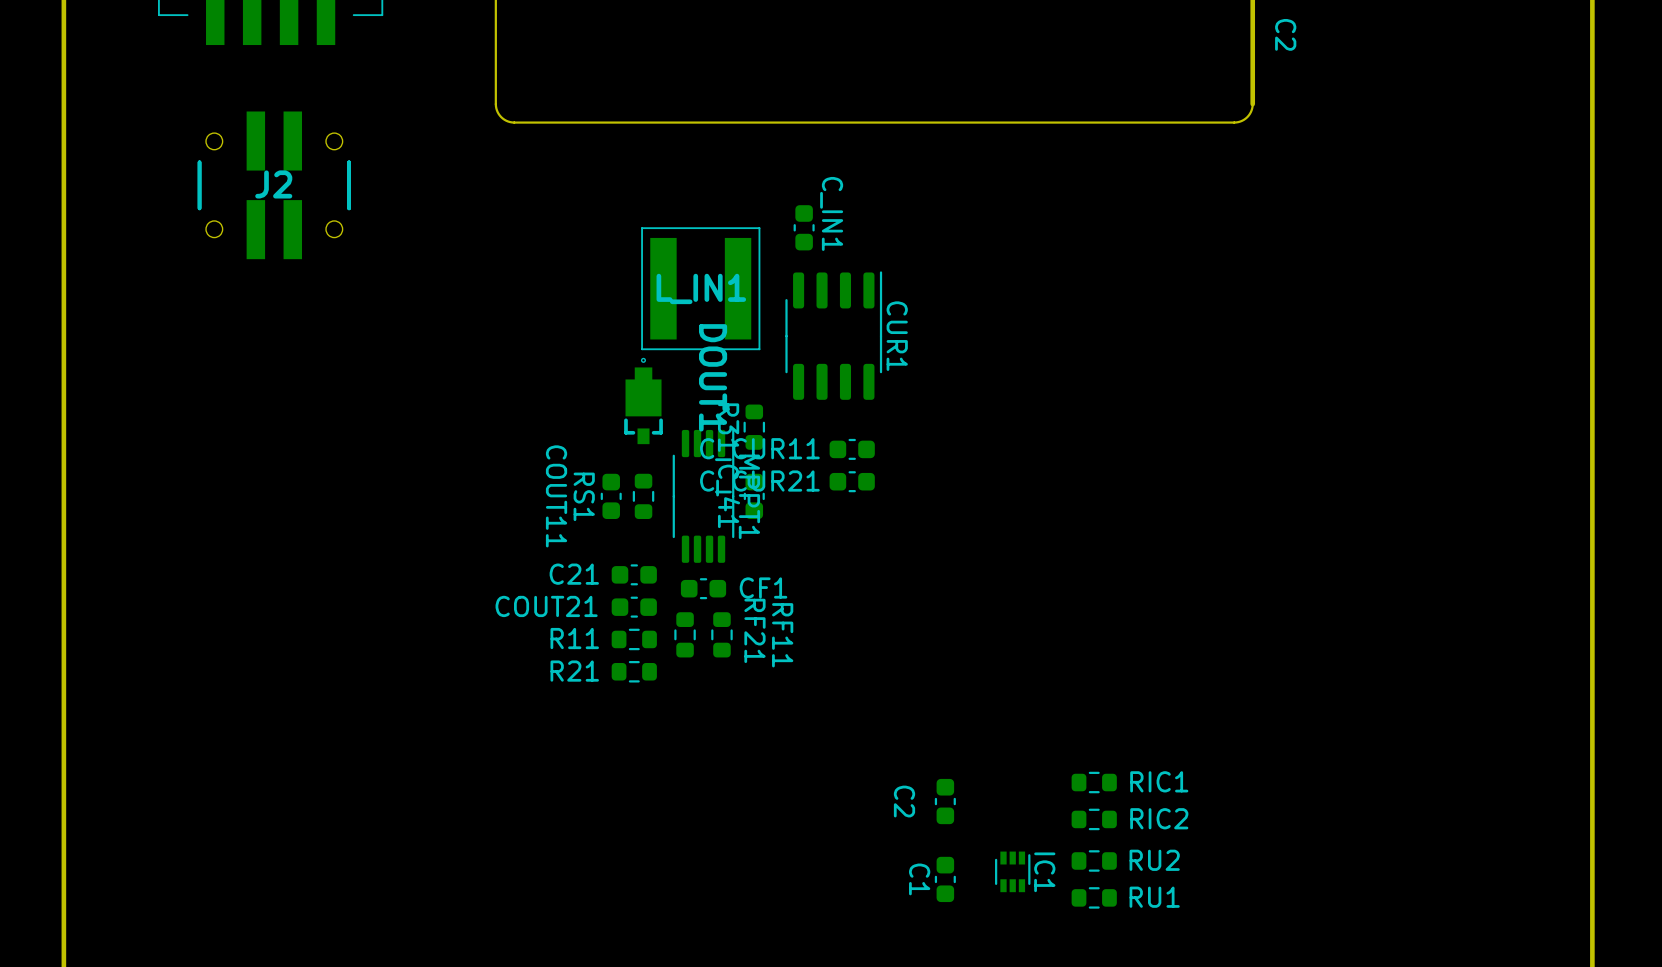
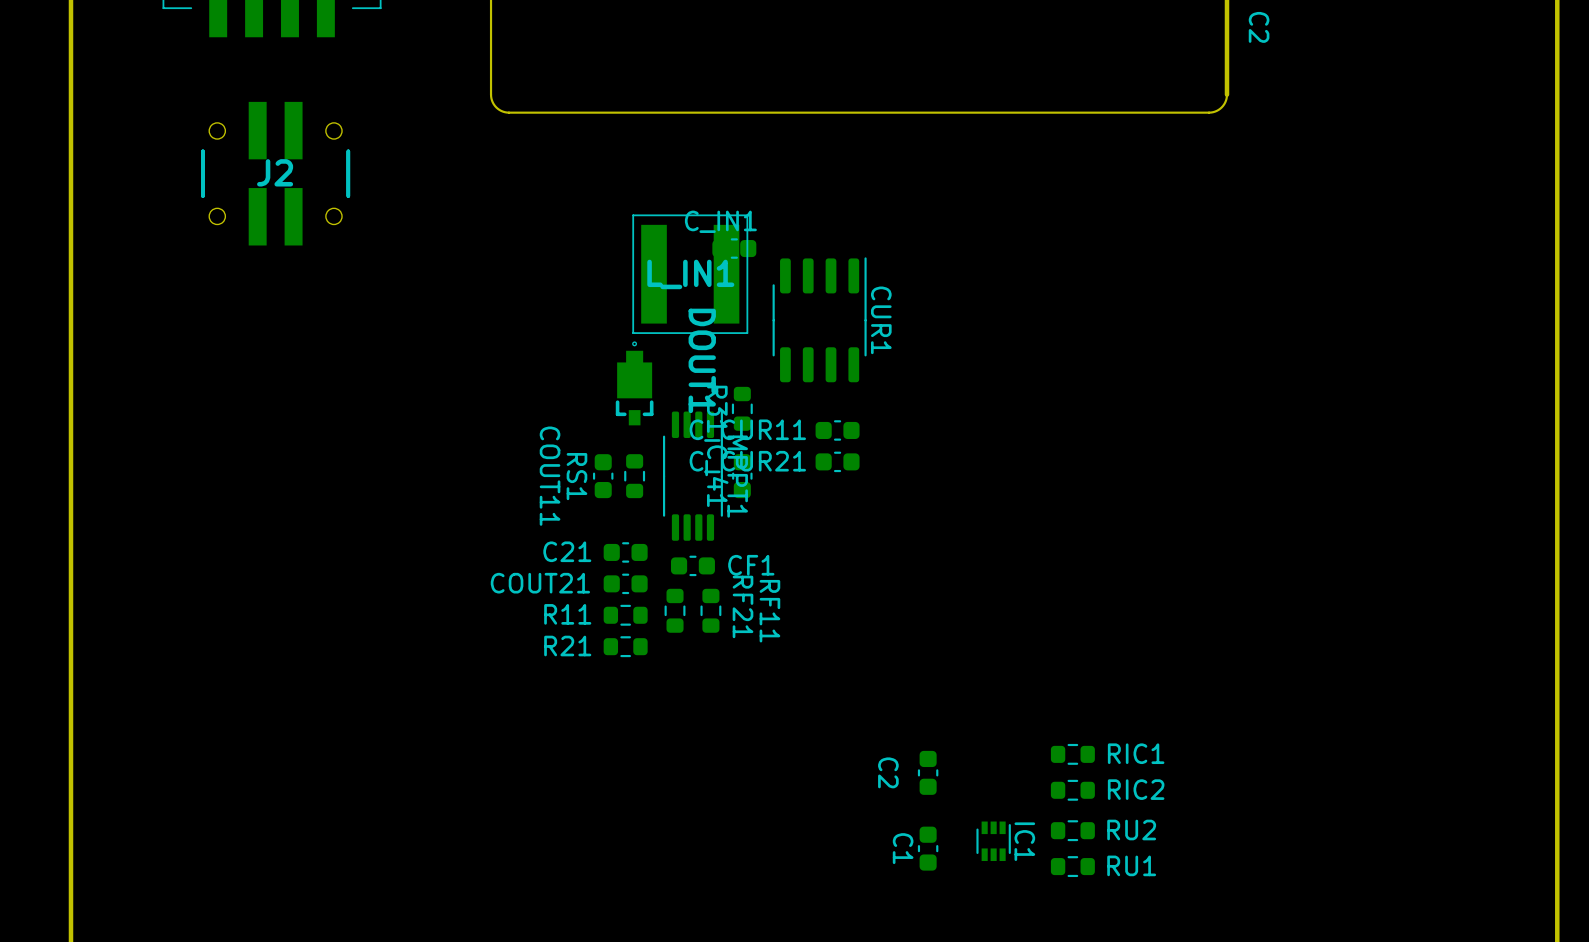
C_IN1 name position: C_IN1 (831, 213) -> C_IN1 (720, 221)
C_IN1 rotation: 0° (804, 227) -> 90° clockwise (734, 248)
C_IN1 position: (804, 227) -> (734, 248)

